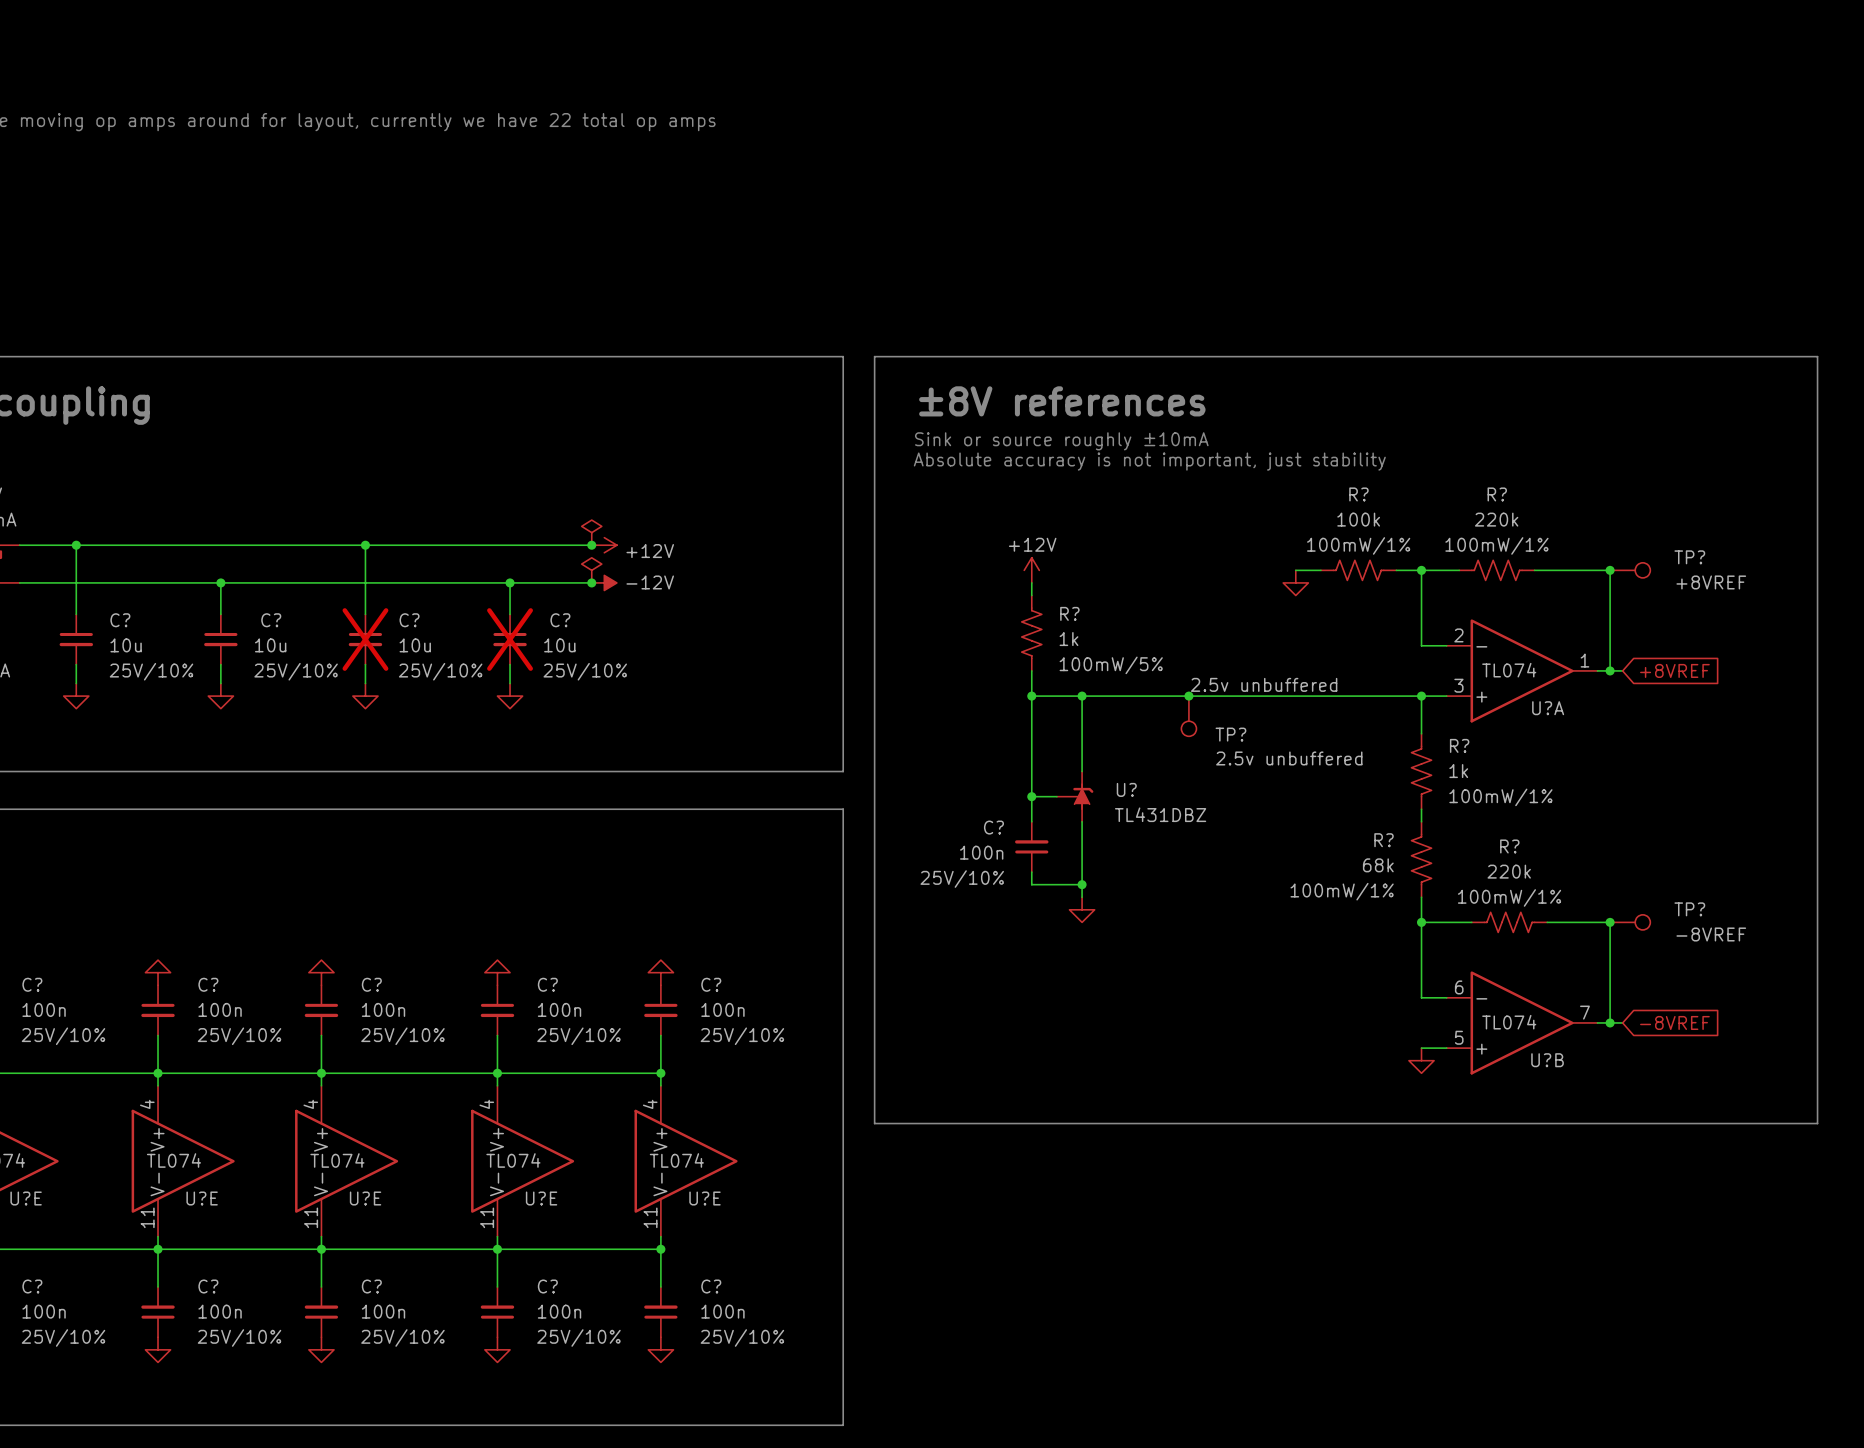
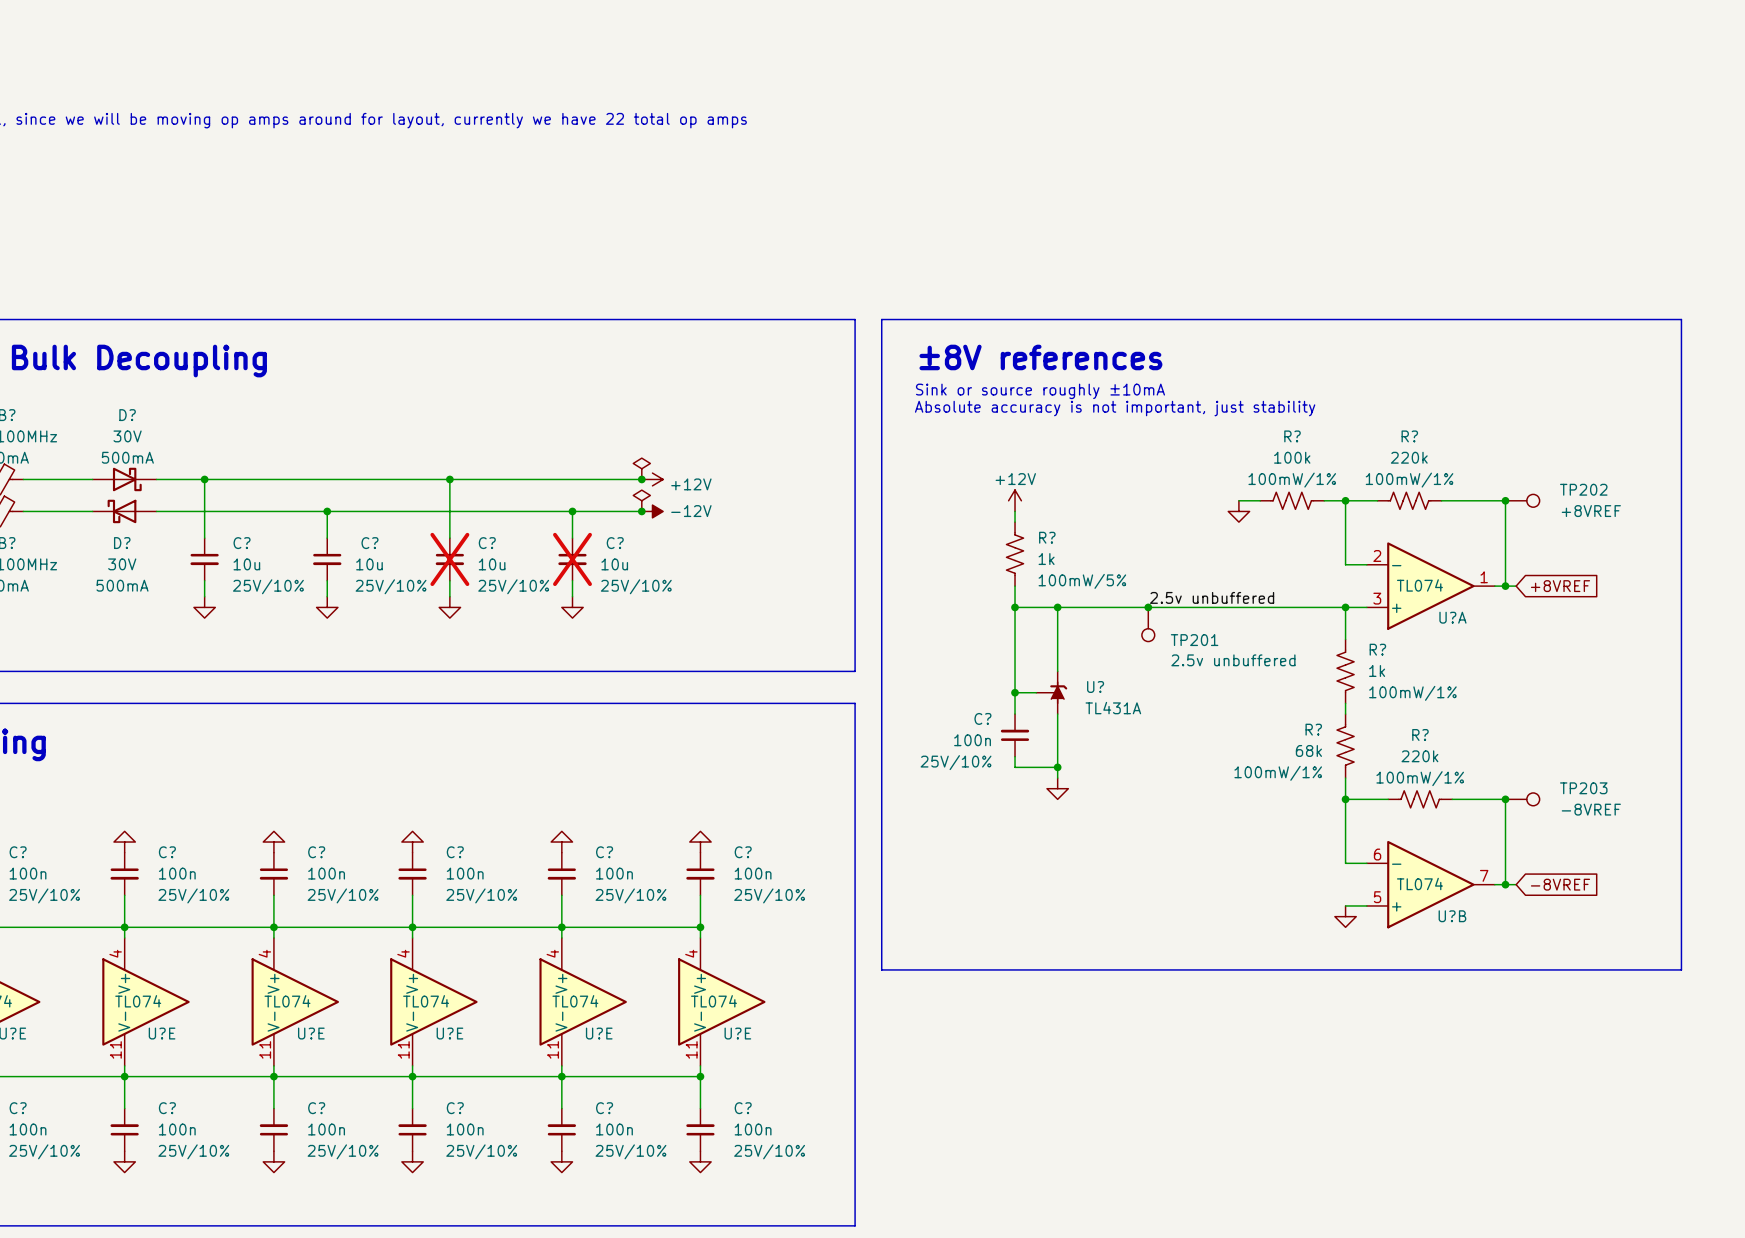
TP? name: TP? (1689, 557) -> TP202 (1583, 489)
TP? name: TP? (1230, 734) -> TP201 (1194, 640)
U? value: TL431DBZ (1160, 814) -> TL431A (1113, 708)
TP? name: TP? (1689, 909) -> TP203 (1583, 788)

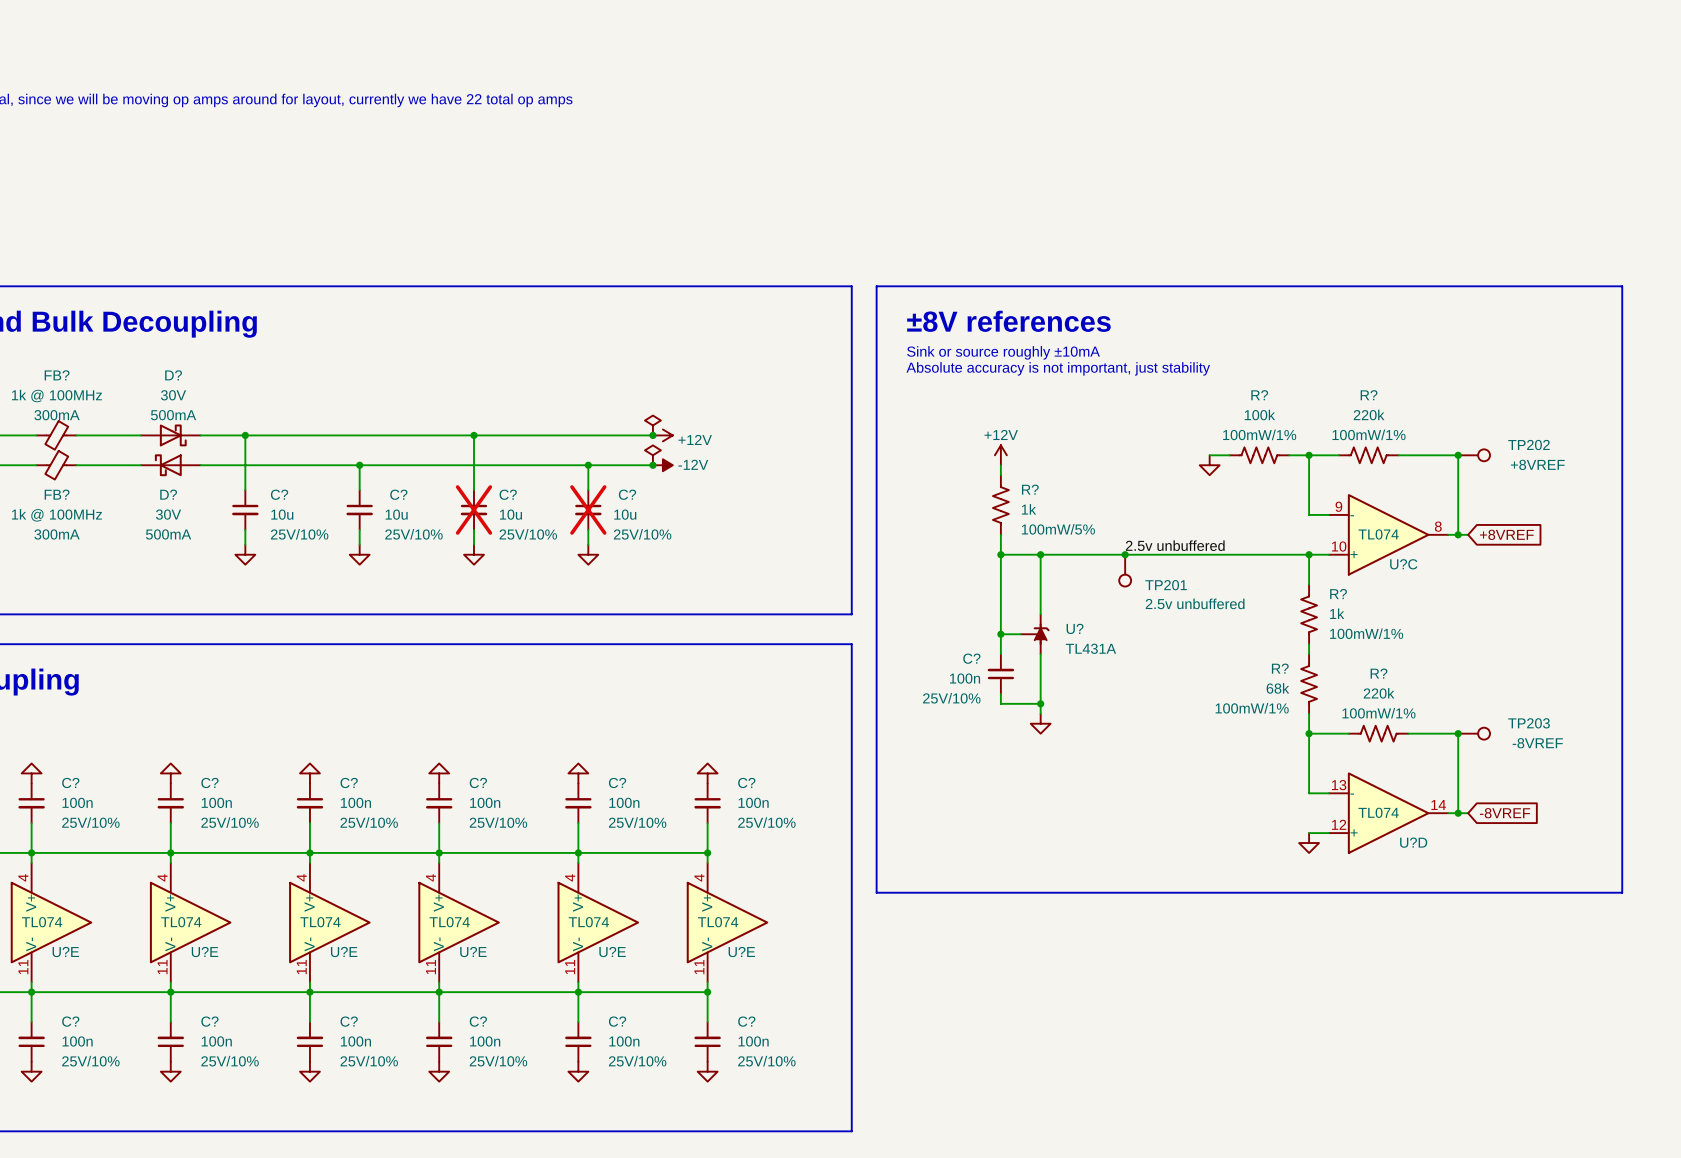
U?A pin number: 2 (1377, 555) -> 9 (1338, 506)
U?A pin number: 1 (1484, 577) -> 8 (1438, 526)
U?A pin number: 3 (1377, 598) -> 10 (1339, 546)
U?A name: U?A (1452, 617) -> U?C (1403, 564)
U?B pin number: 6 (1377, 854) -> 13 (1339, 785)
U?B pin number: 7 (1484, 875) -> 14 (1438, 805)
U?B pin number: 5 (1377, 897) -> 12 (1339, 824)
U?B name: U?B (1452, 916) -> U?D (1413, 842)

